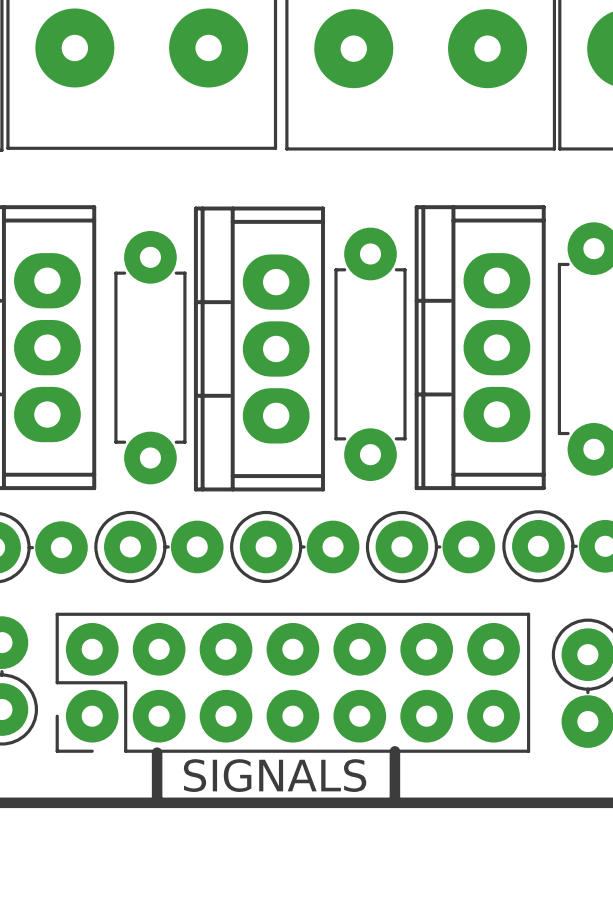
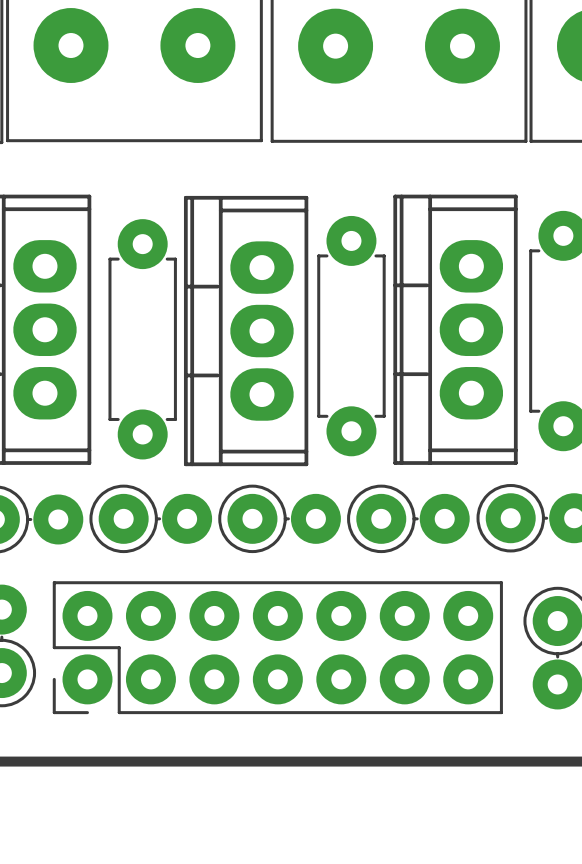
line: (394, 751) (394, 801) -> none
line: (157, 752) (157, 800) -> none
text: SIGNALS (275, 775) -> none

